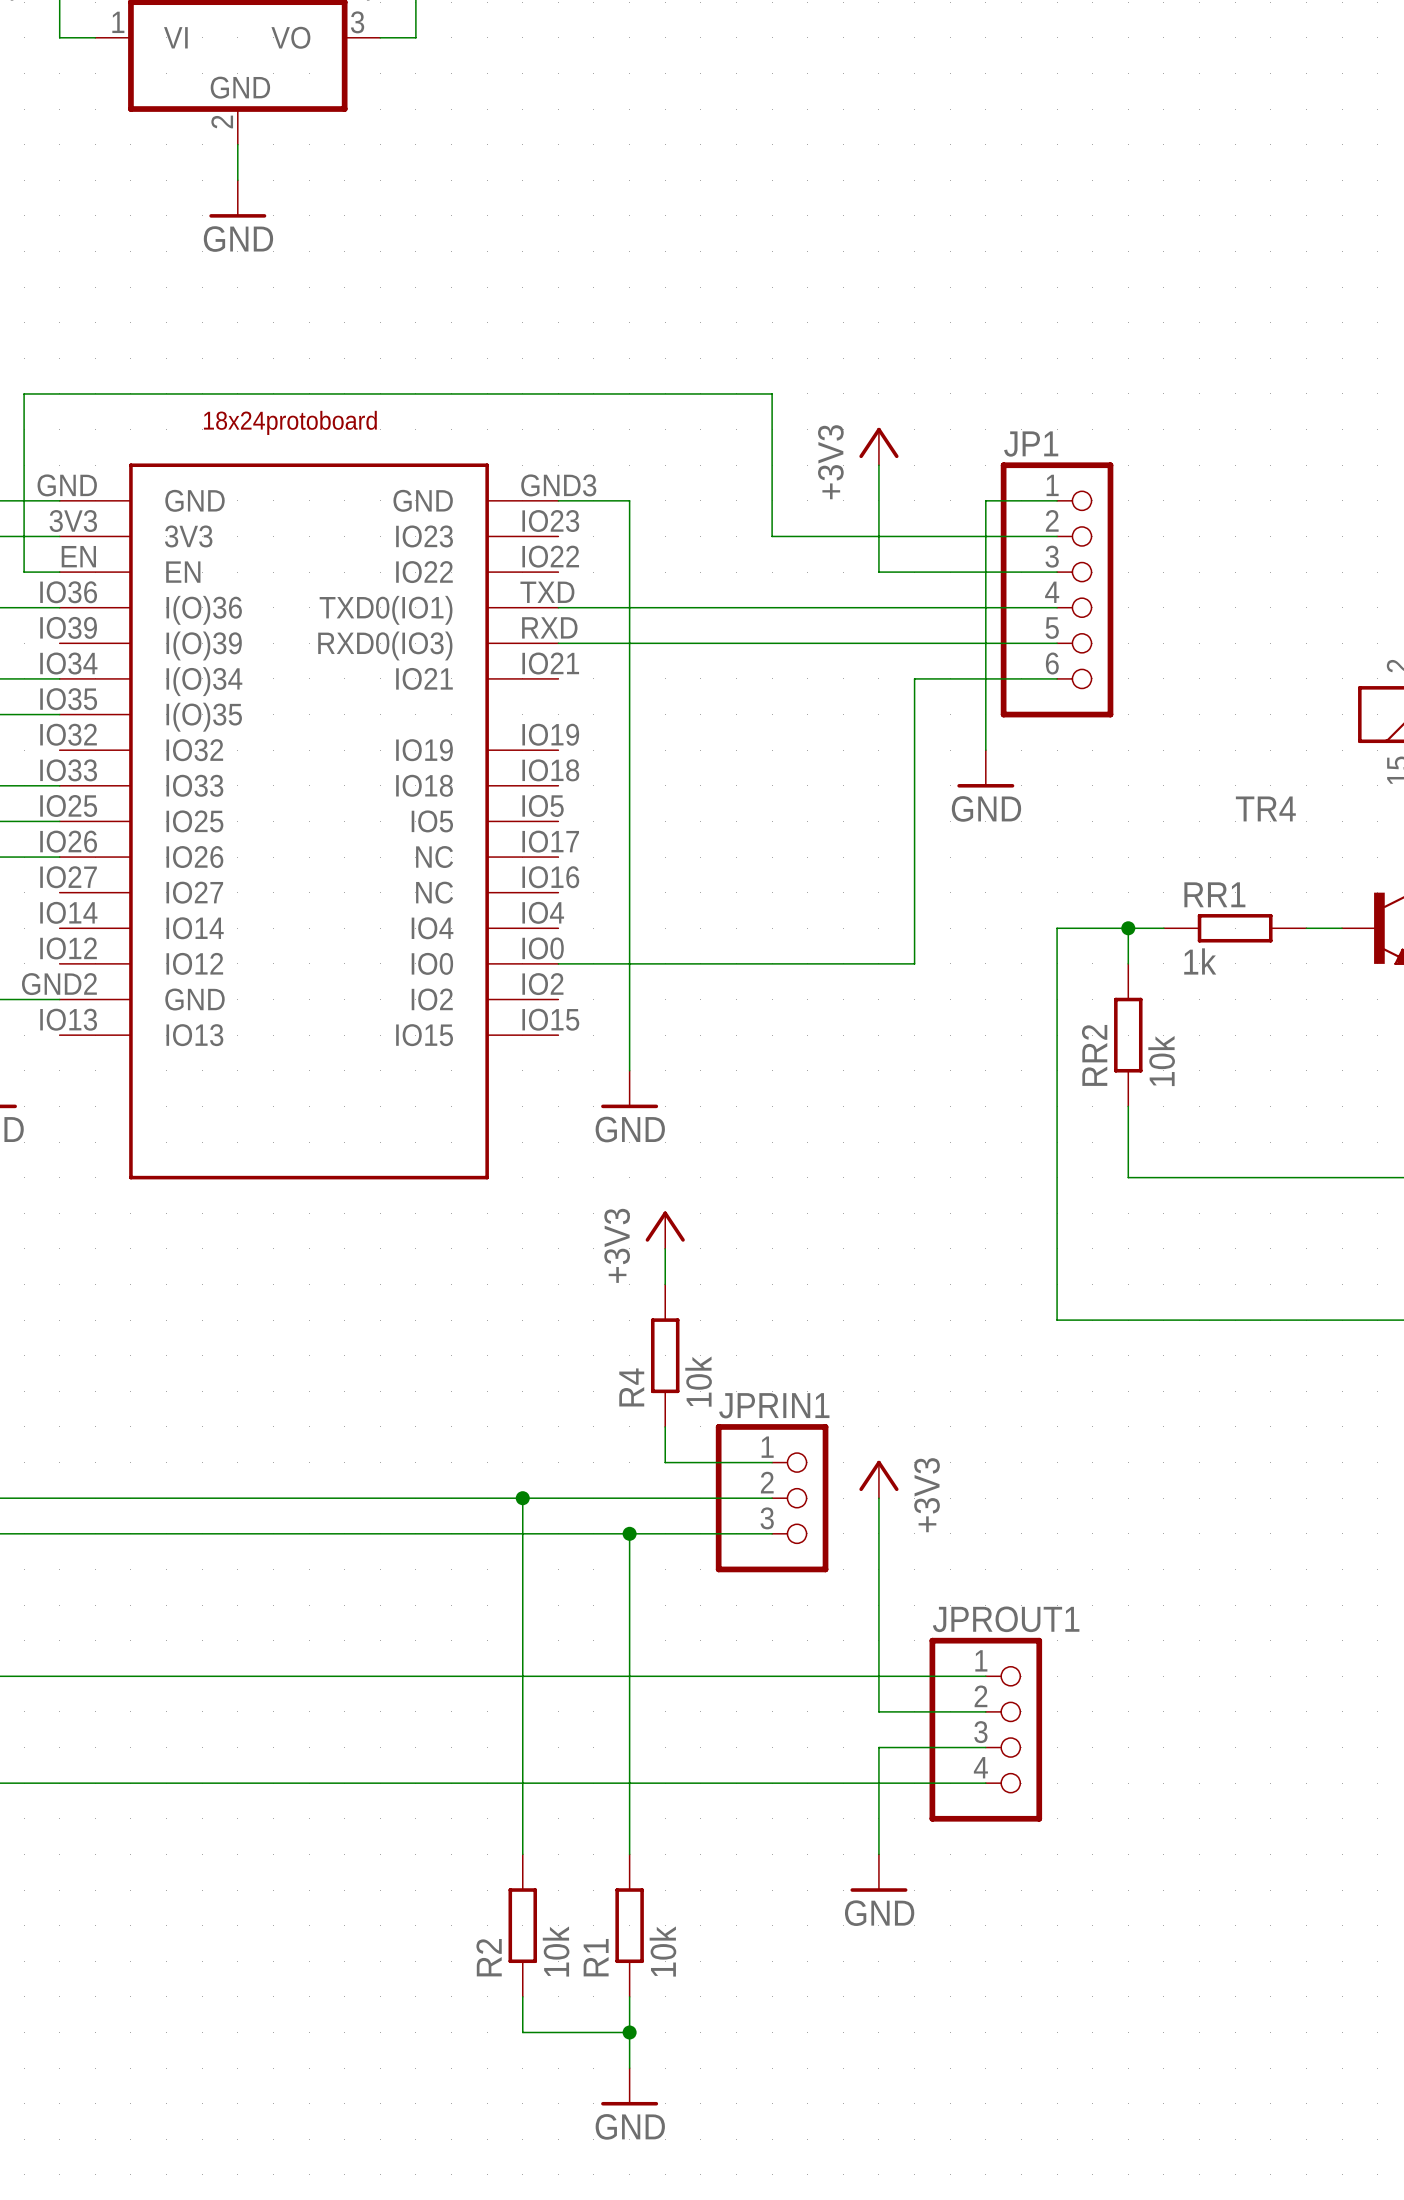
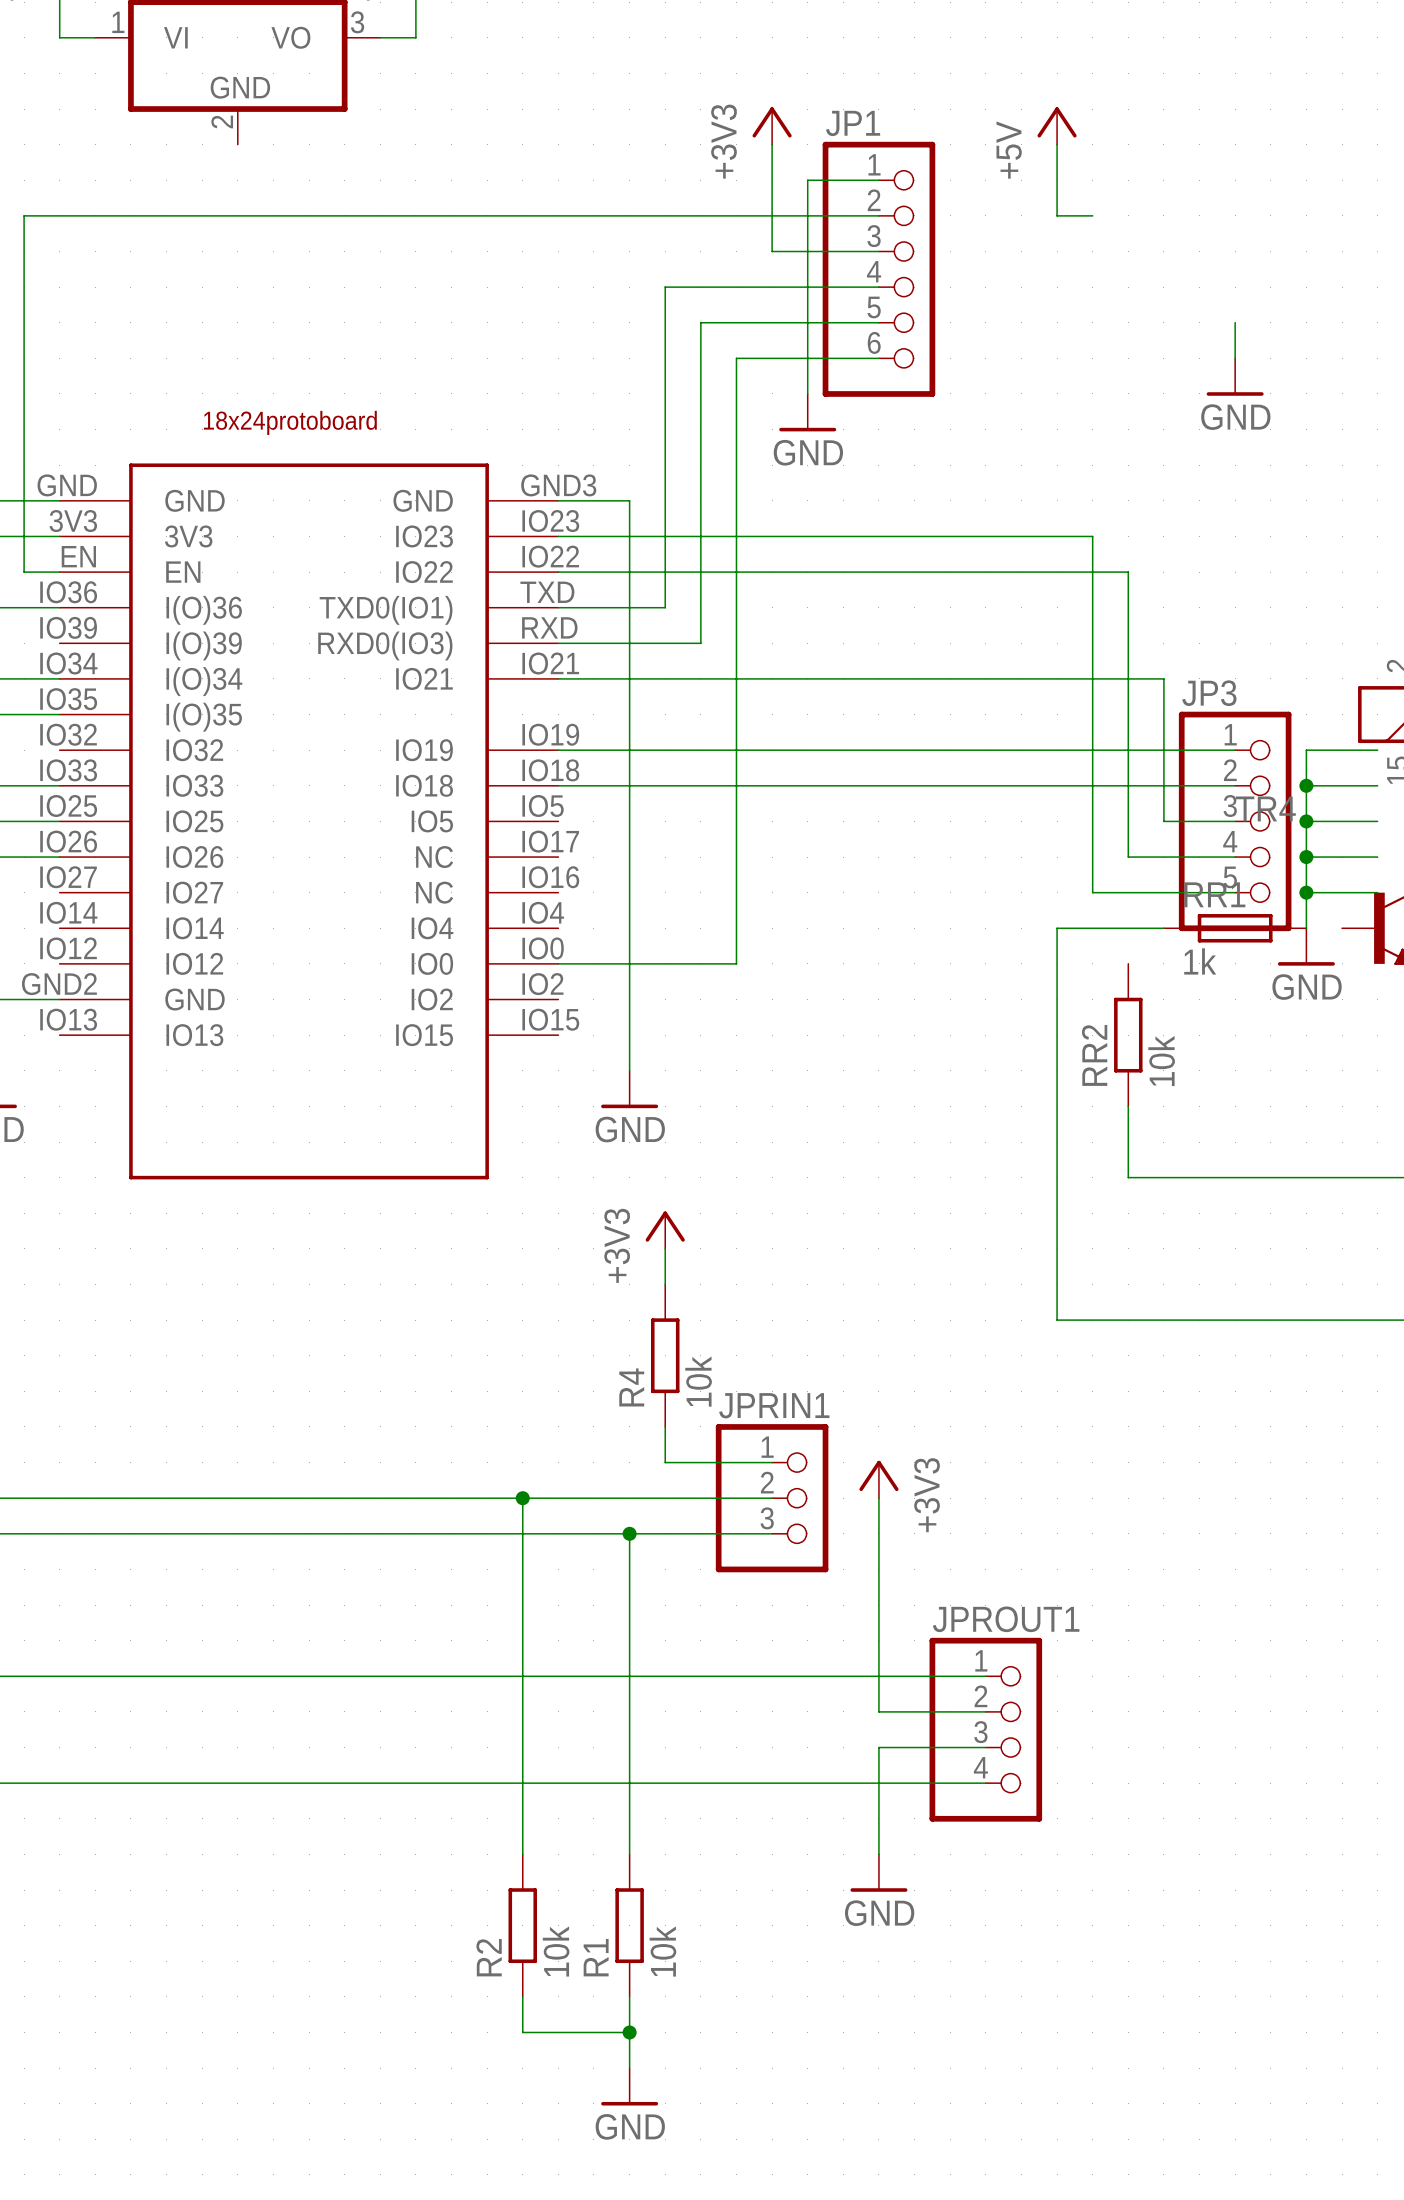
power symbol: none -> +5V (1057, 125)
wire: (237, 144) (237, 180) -> none
wire: none -> (772, 144) (772, 251) (878, 251)
wire: none -> (1057, 144) (1057, 215) (1092, 215)
wire: none -> (878, 180) (807, 180) (807, 393)
power symbol: GND (237, 198) -> none
wire: none -> (1235, 322) (1235, 358)
power symbol: none -> GND (1235, 377)
wire: (24, 393) (772, 393) (772, 536) -> (24, 393) (24, 215) (878, 215)
power symbol: none -> GND (807, 412)
power symbol position: +3V3 (878, 446) -> +3V3 (772, 125)
wire: (878, 465) (878, 572) -> (558, 572) (878, 572)
wire: (1057, 500) (985, 500) (985, 750) -> none
wire: none -> (558, 536) (772, 536)
wire: none -> (1057, 536) (1092, 536) (1092, 892) (1235, 892)
wire: none -> (1057, 572) (1128, 572) (1128, 857) (1235, 857)
JP1 position: (1057, 589) -> (878, 269)
wire: (665, 607) (1057, 607) -> (665, 607) (665, 287) (878, 287)
wire: (700, 643) (1057, 643) -> (700, 643) (700, 322) (878, 322)
wire: none -> (558, 678) (914, 678)
wire: (914, 678) (914, 963) (736, 963) -> (878, 358) (736, 358) (736, 963)
wire: none -> (1057, 678) (1163, 678) (1163, 821) (1235, 821)
wire: none -> (558, 750) (1235, 750)
power symbol: GND (985, 768) -> none
wire: none -> (558, 785) (1235, 785)
wire: none -> (1306, 785) (1377, 785)
junction: none -> (1306, 785)
JP3: none -> (1235, 821)
wire: none -> (1306, 821) (1377, 821)
junction: none -> (1306, 821)
wire: none -> (1306, 857) (1377, 857)
junction: none -> (1306, 857)
wire: none -> (1306, 892) (1377, 892)
junction: none -> (1306, 892)
wire: (1128, 928) (1128, 963) -> none
junction: (1128, 928) -> none
wire: (1306, 928) (1342, 928) -> (1306, 928) (1306, 750) (1377, 750)
power symbol: none -> GND (1306, 946)

